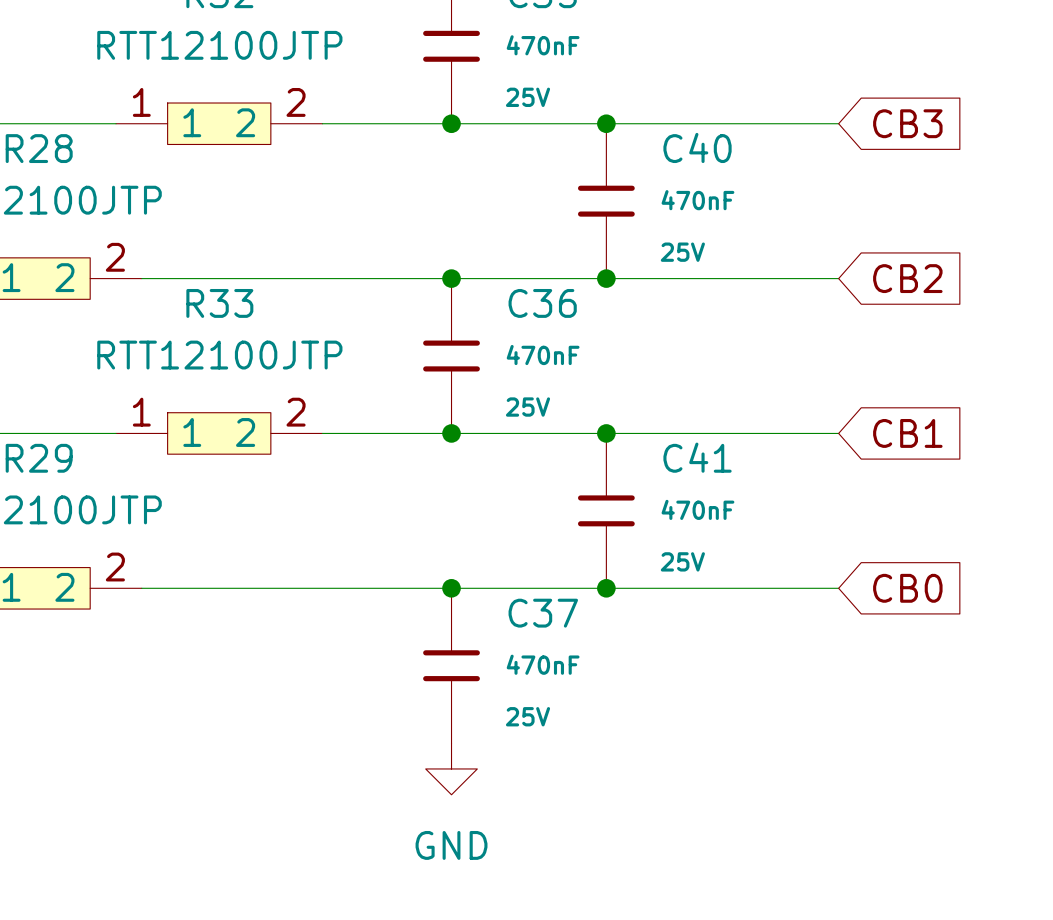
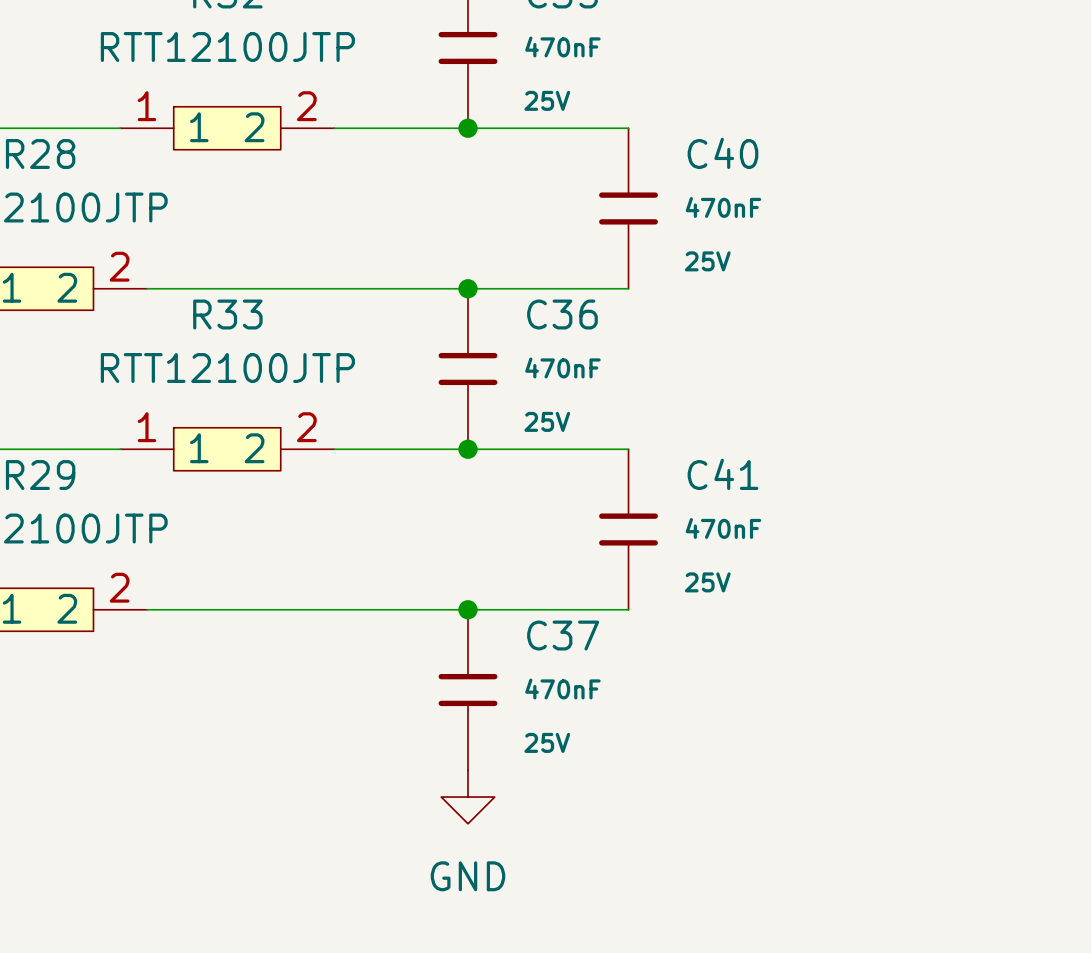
wire: (606, 123) (838, 123) -> none
junction: (606, 123) -> none
global label: CB3 (907, 123) -> none
wire: (606, 278) (838, 278) -> none
junction: (606, 278) -> none
global label: CB2 (907, 278) -> none
wire: (606, 433) (838, 433) -> none
junction: (606, 433) -> none
global label: CB1 (907, 433) -> none
wire: (606, 588) (838, 588) -> none
junction: (606, 588) -> none
global label: CB0 (907, 588) -> none

